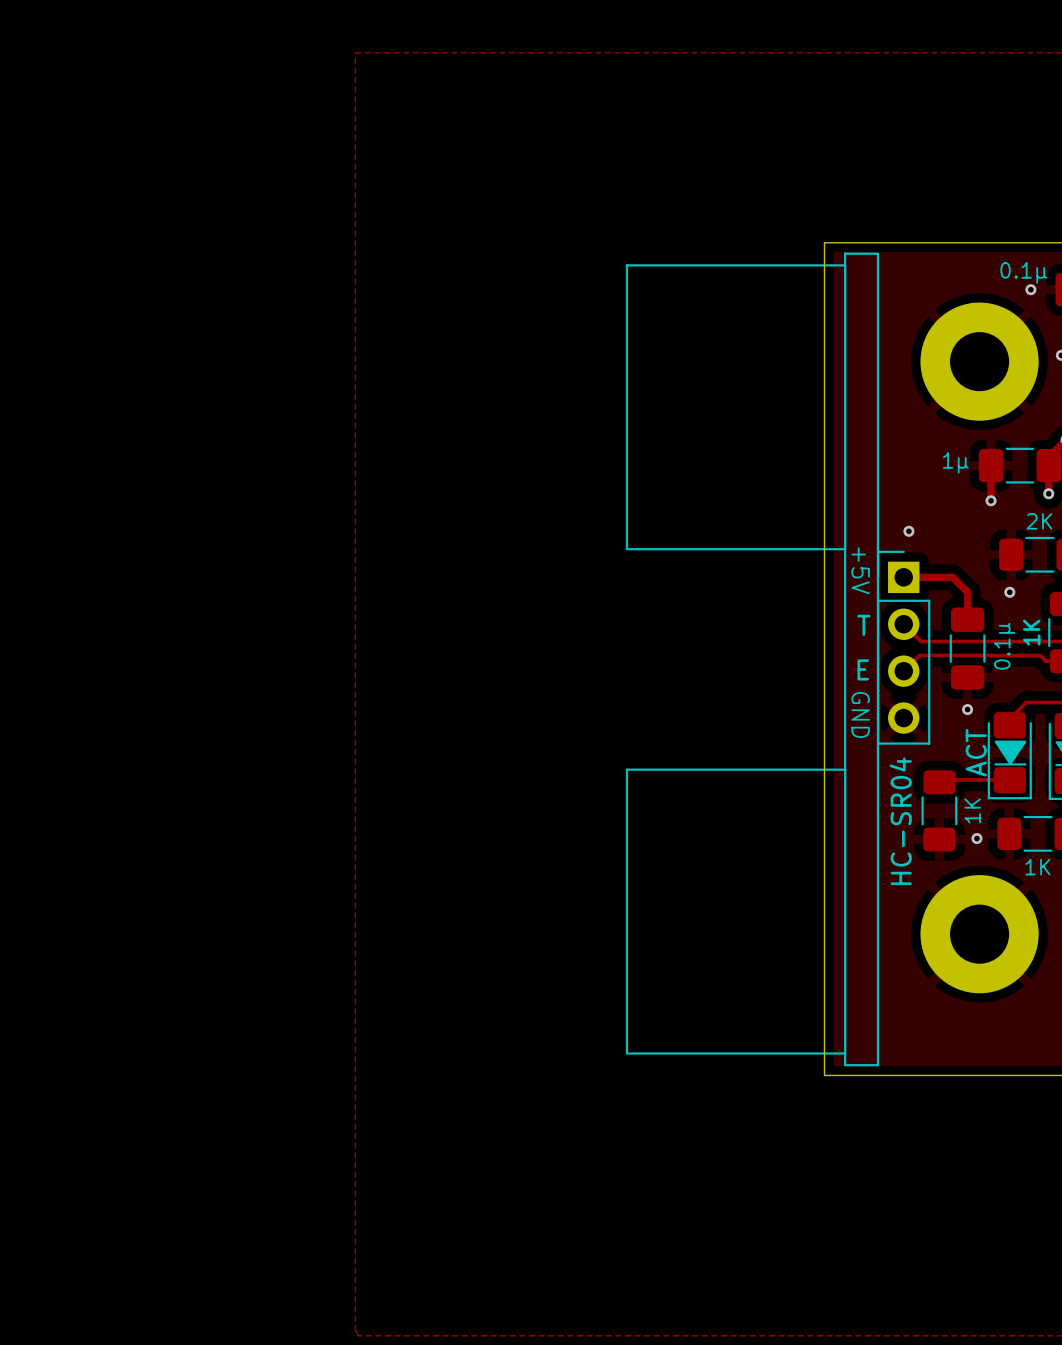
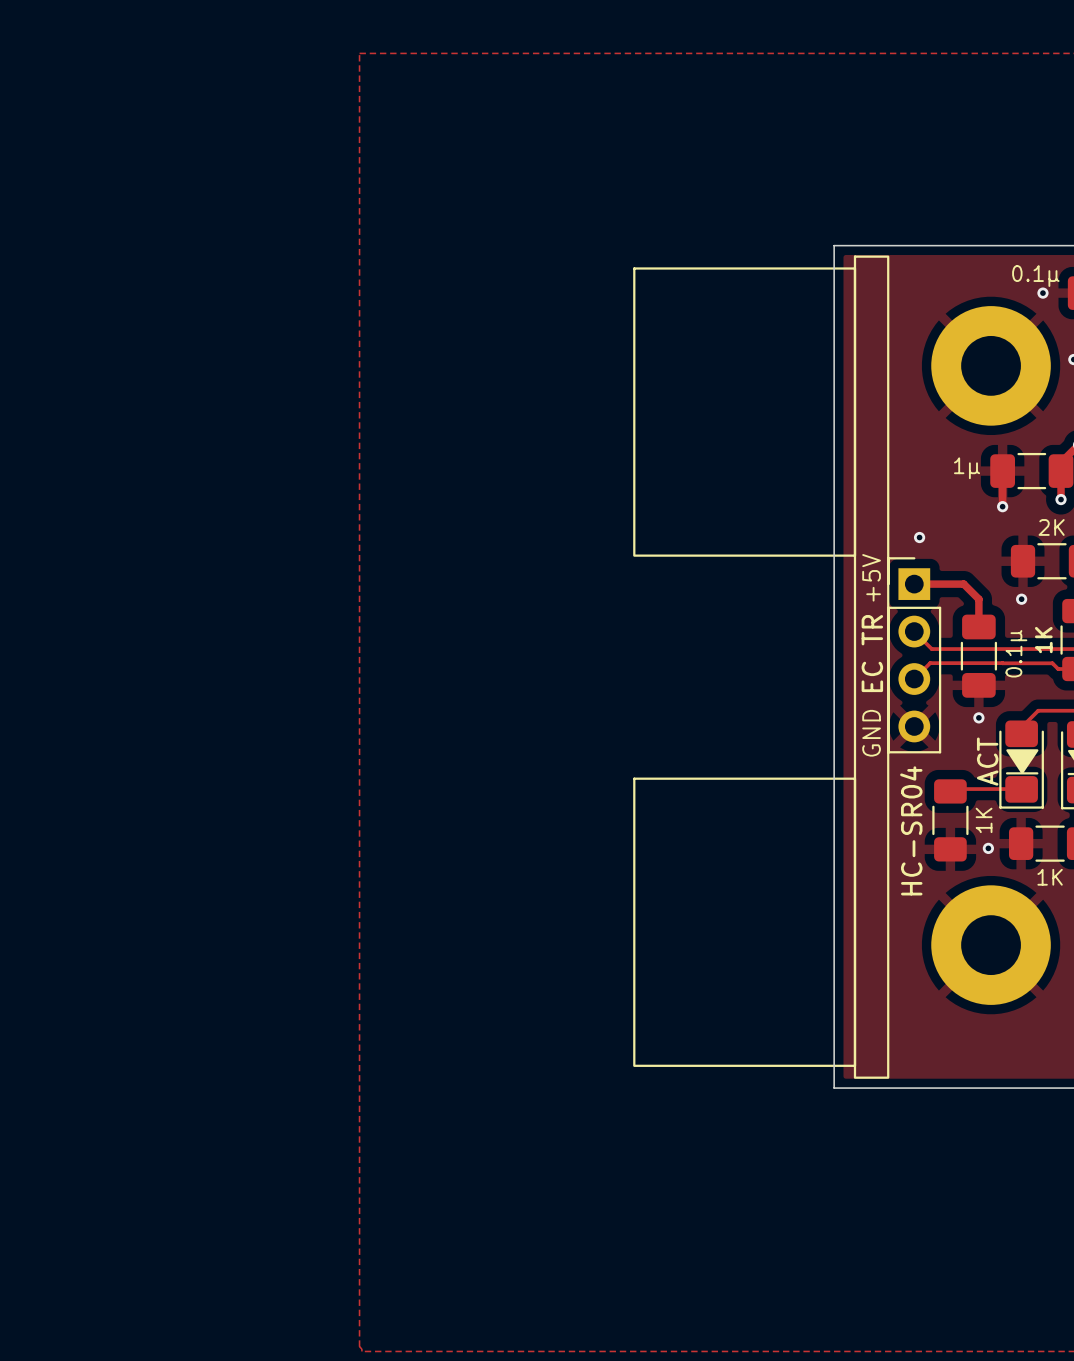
part text rotation: 0° (860, 570) -> 180° (871, 577)
part text: none -> TR (872, 630)
part text: T (863, 625) -> none
part text: none -> EC (872, 676)
part text: E (863, 669) -> none
part text rotation: 0° (860, 714) -> 180° (871, 733)

